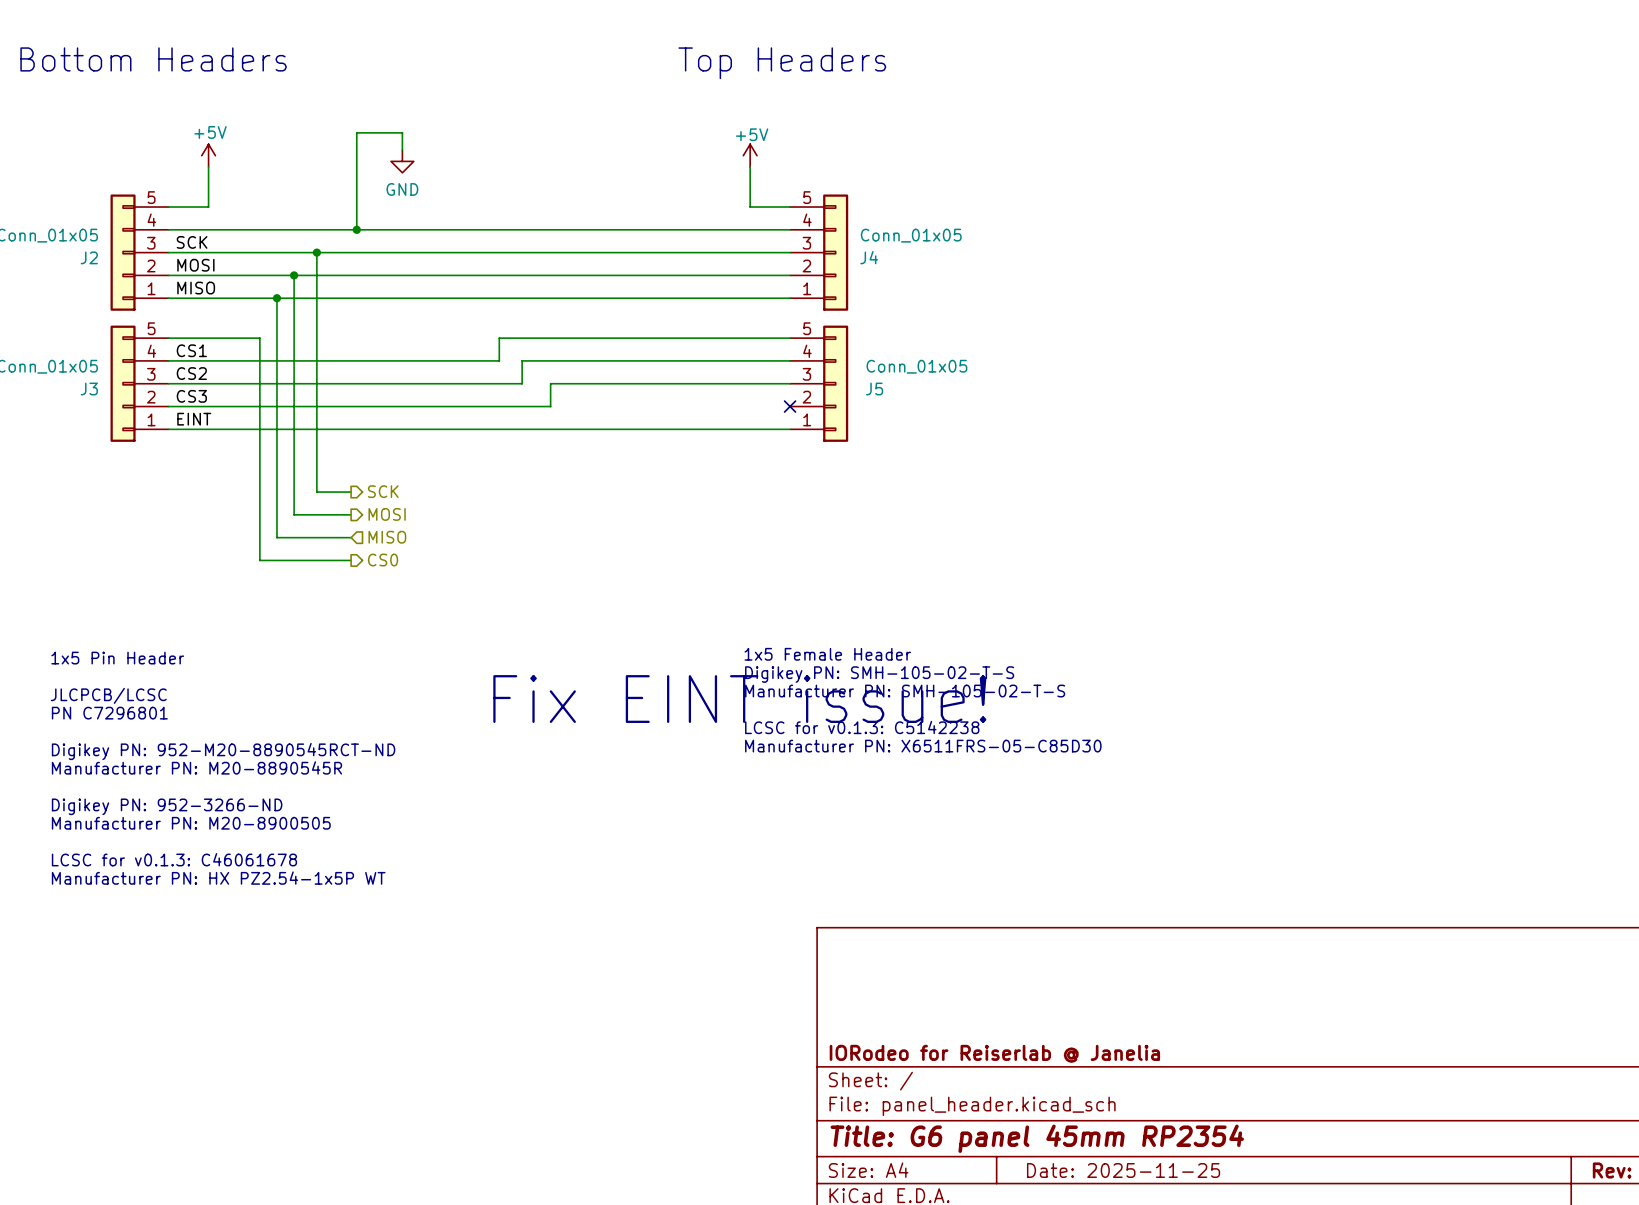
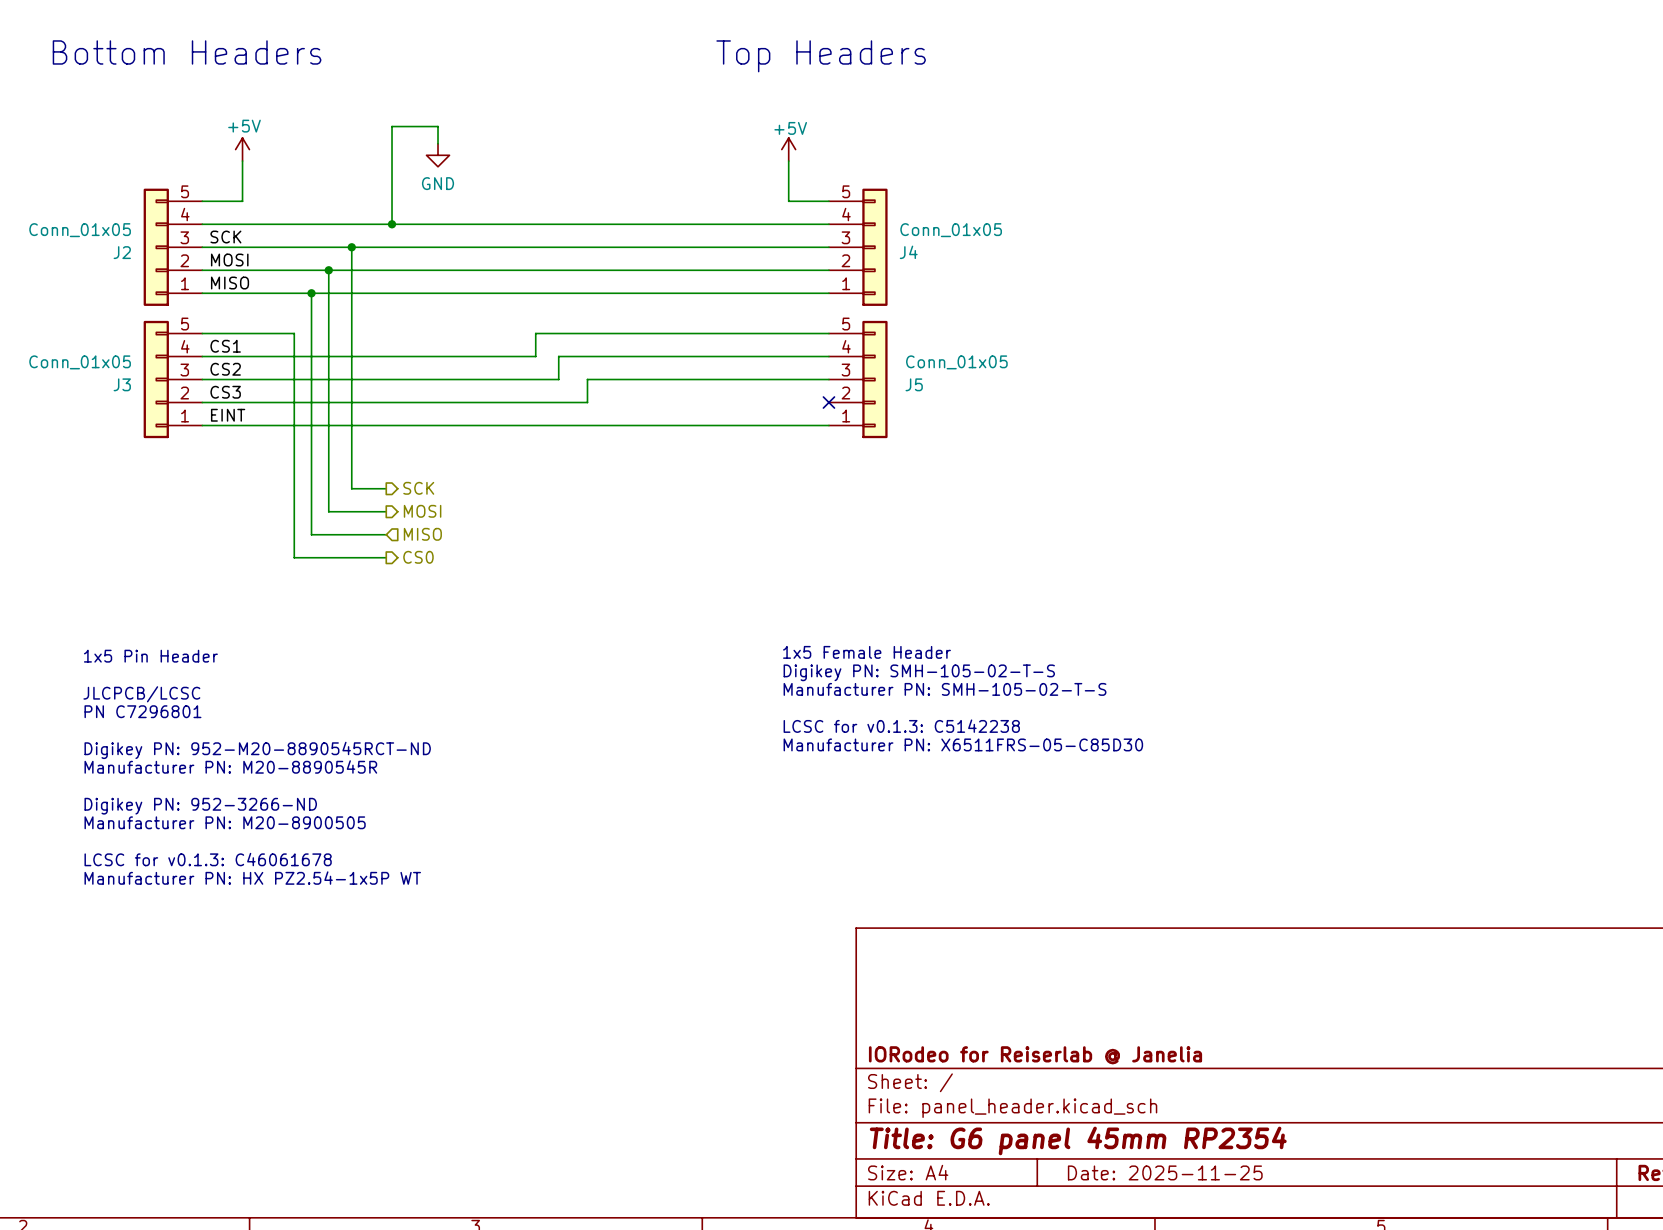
text: Fix EINT issue! (739, 699) -> none

